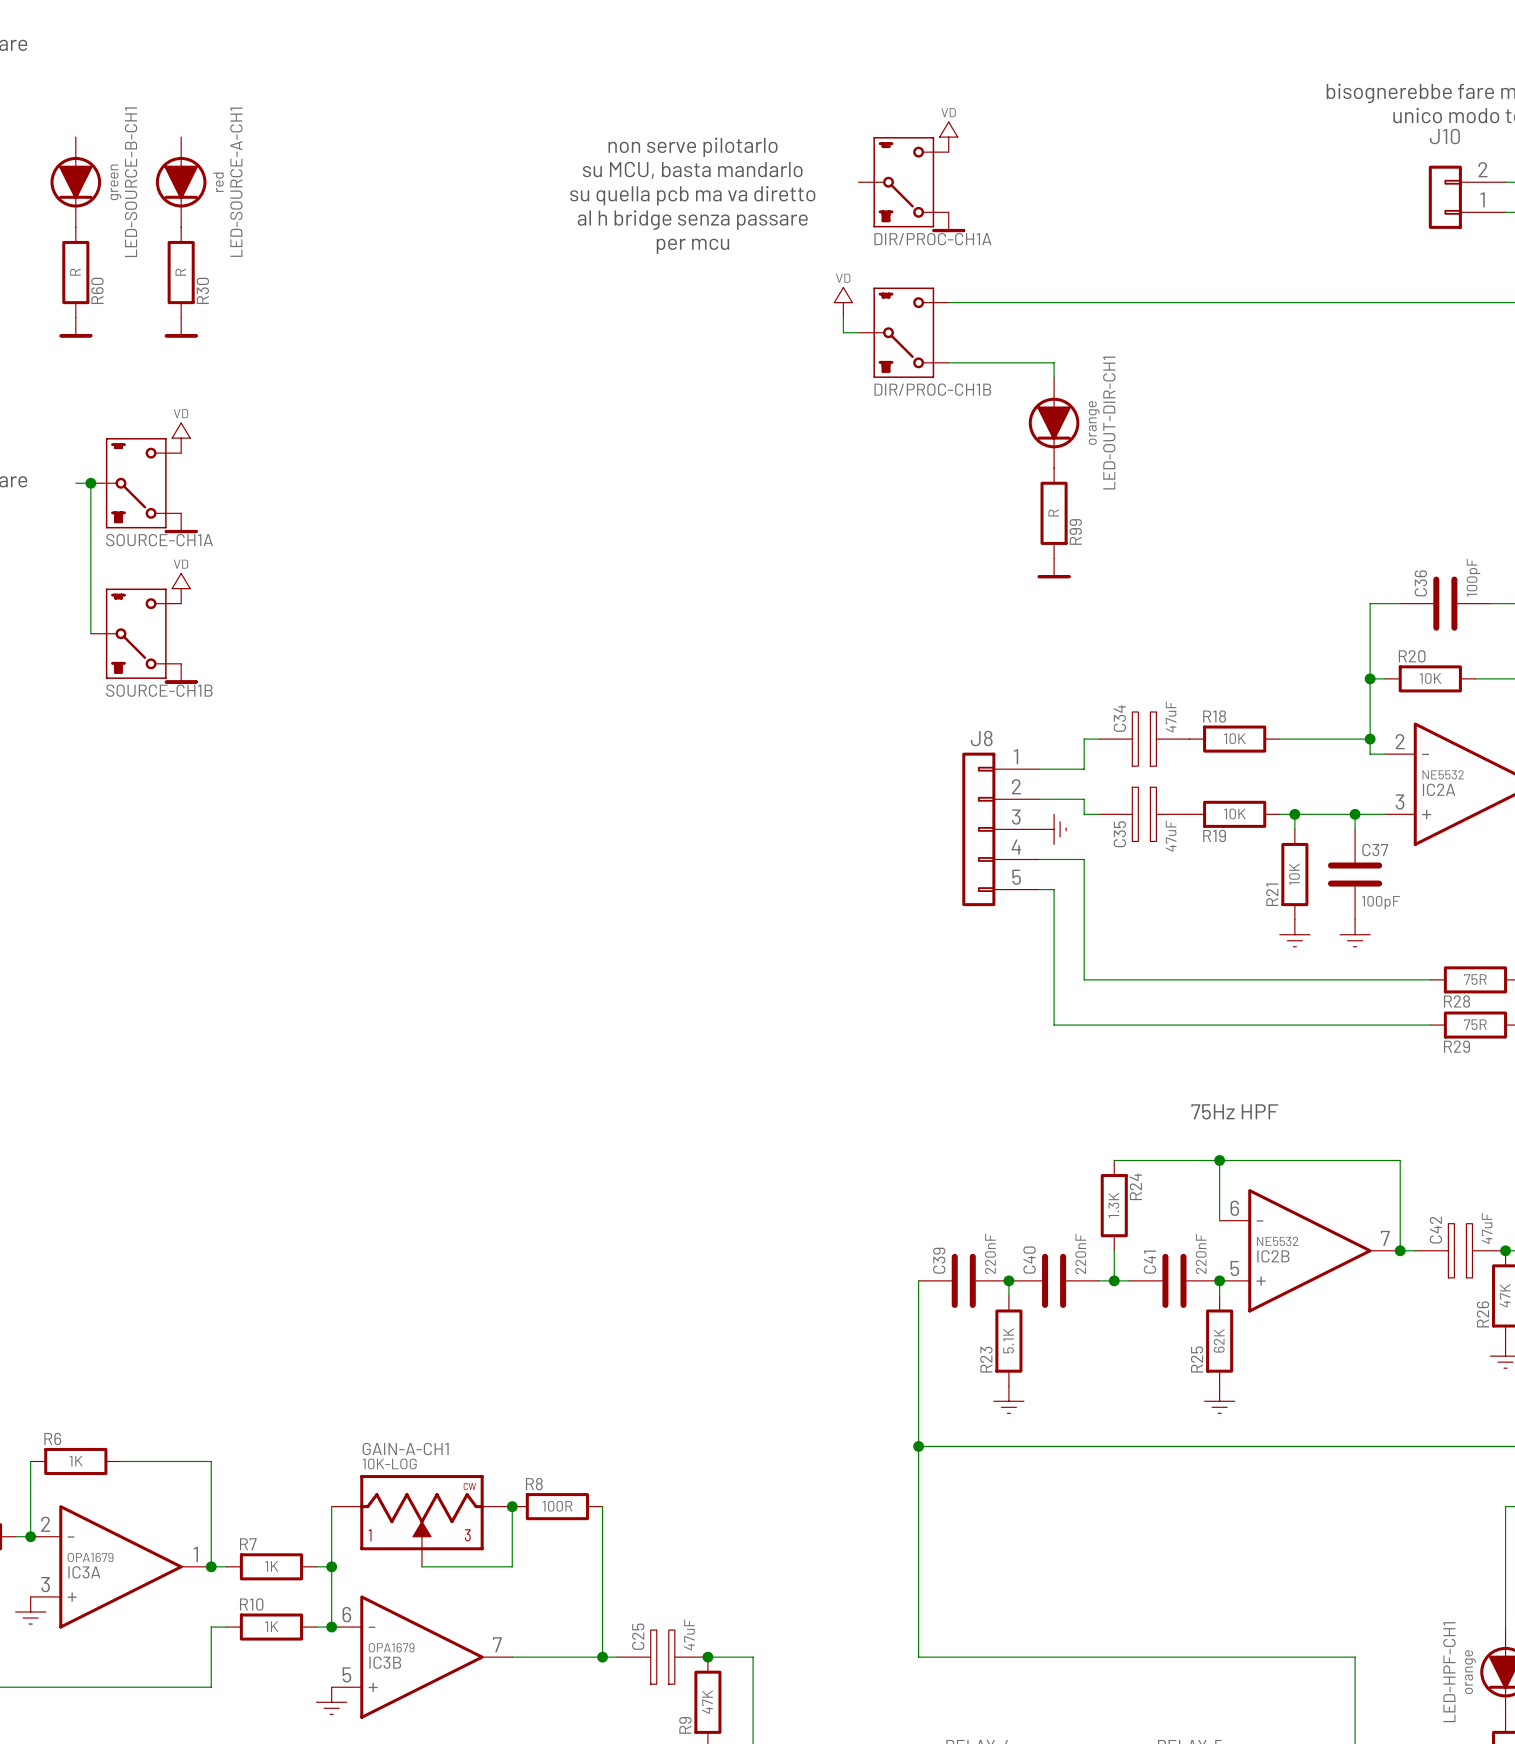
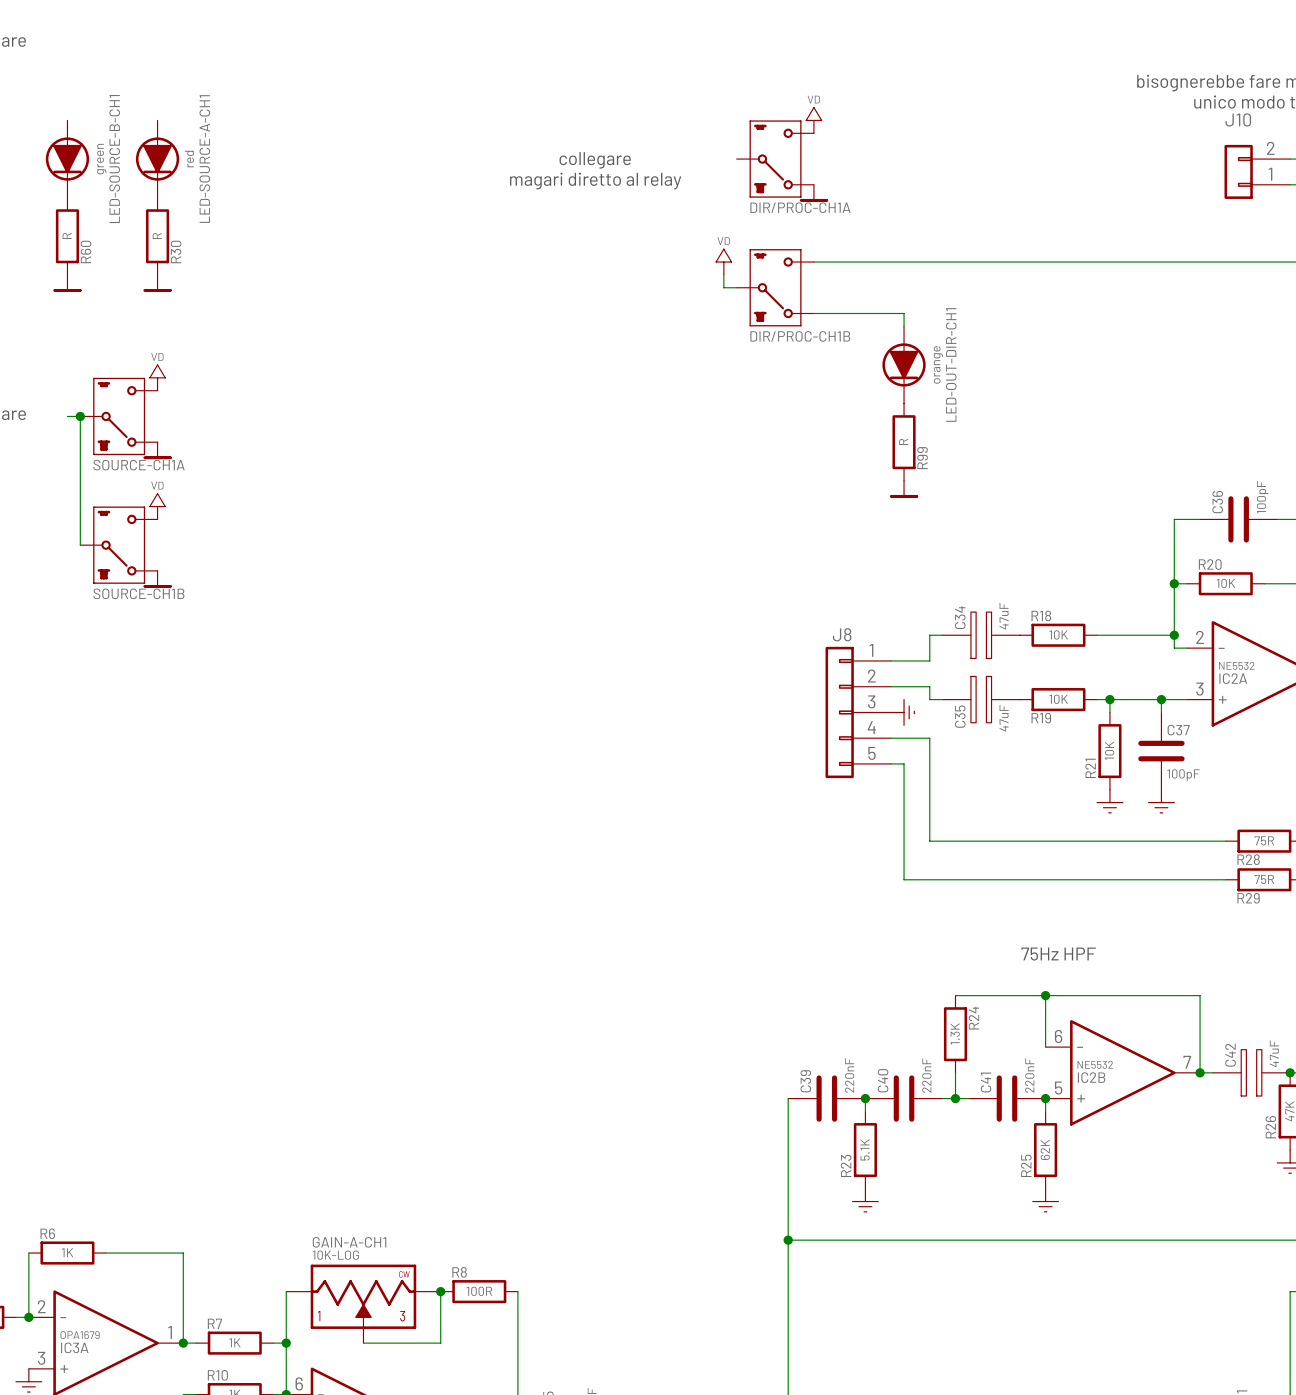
text: non serve pilotarlo (693, 147) -> none
text: su MCU, basta mandarlo (692, 170) -> none
text: none -> collegare (595, 160)
text: su quella pcb ma va diretto (692, 195) -> none
text: none -> magari diretto al relay (595, 181)
text: al h bridge senza passare (692, 220) -> none
text: per mcu (692, 246) -> none

